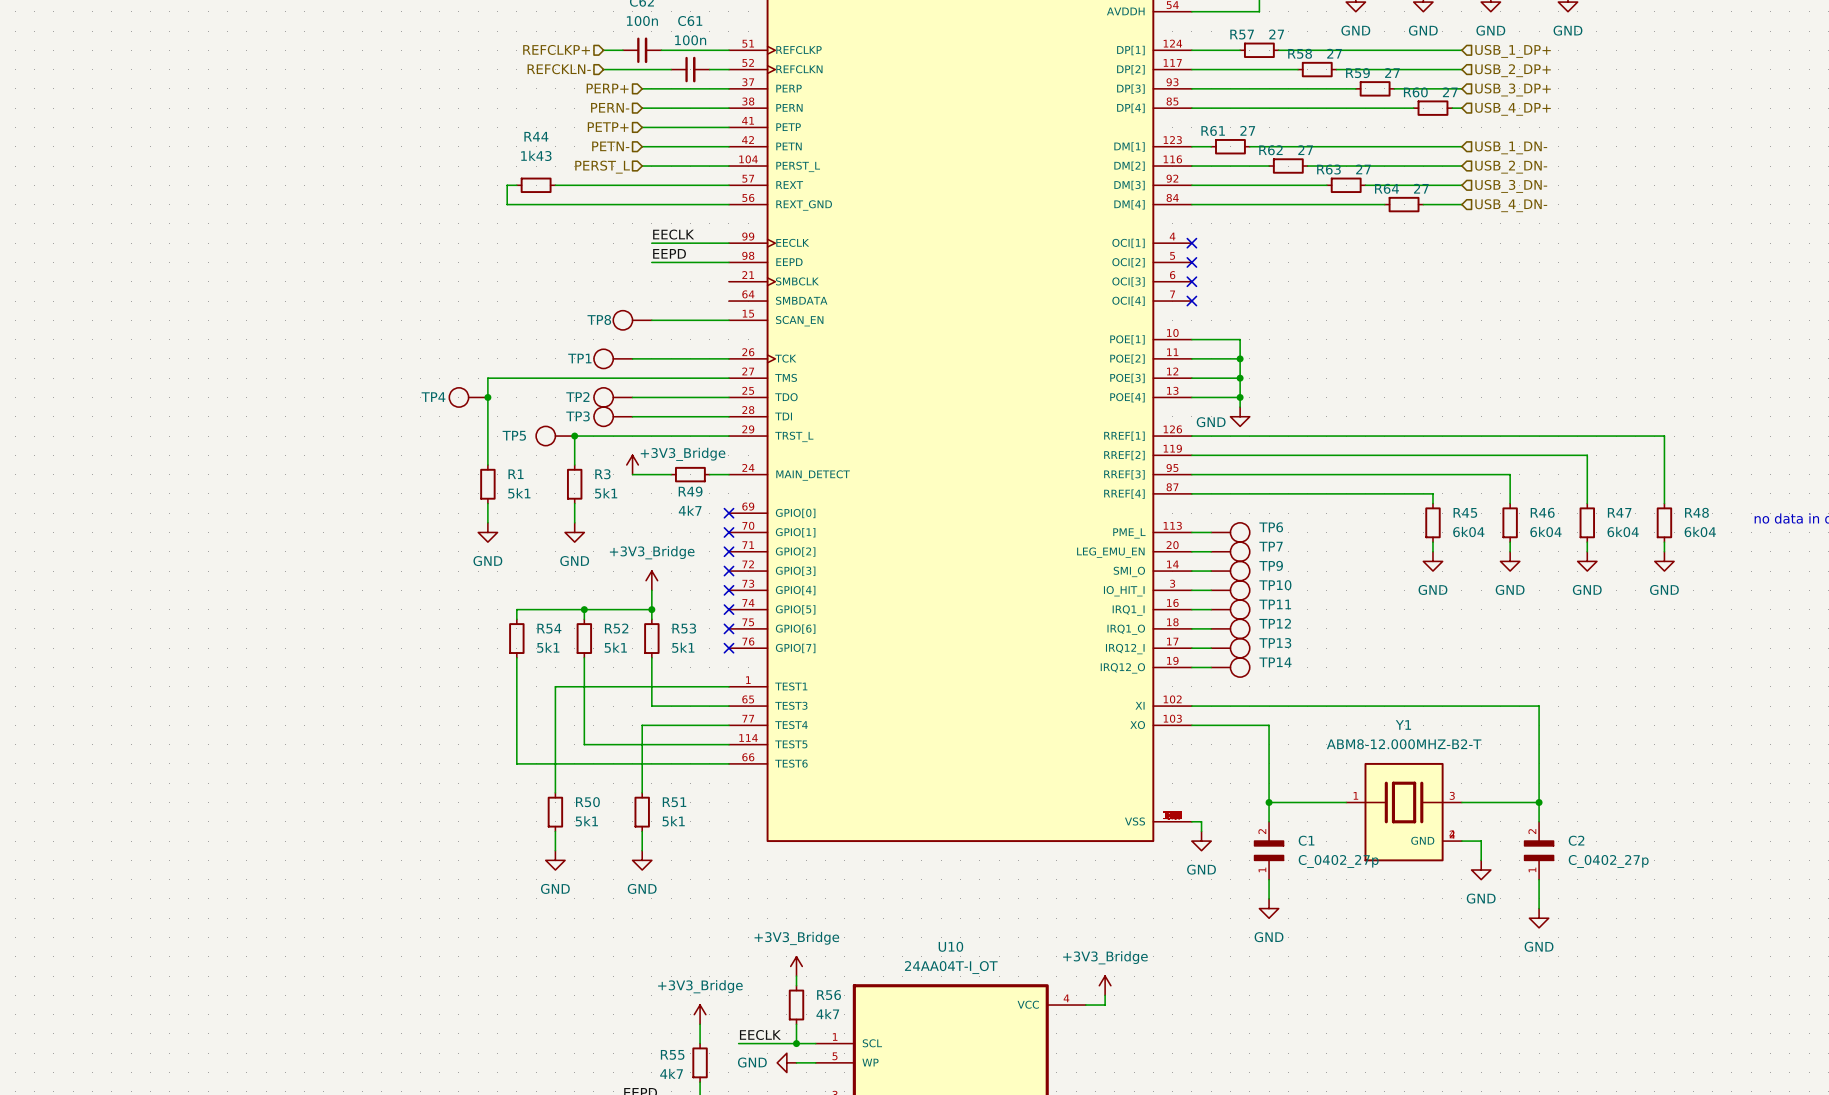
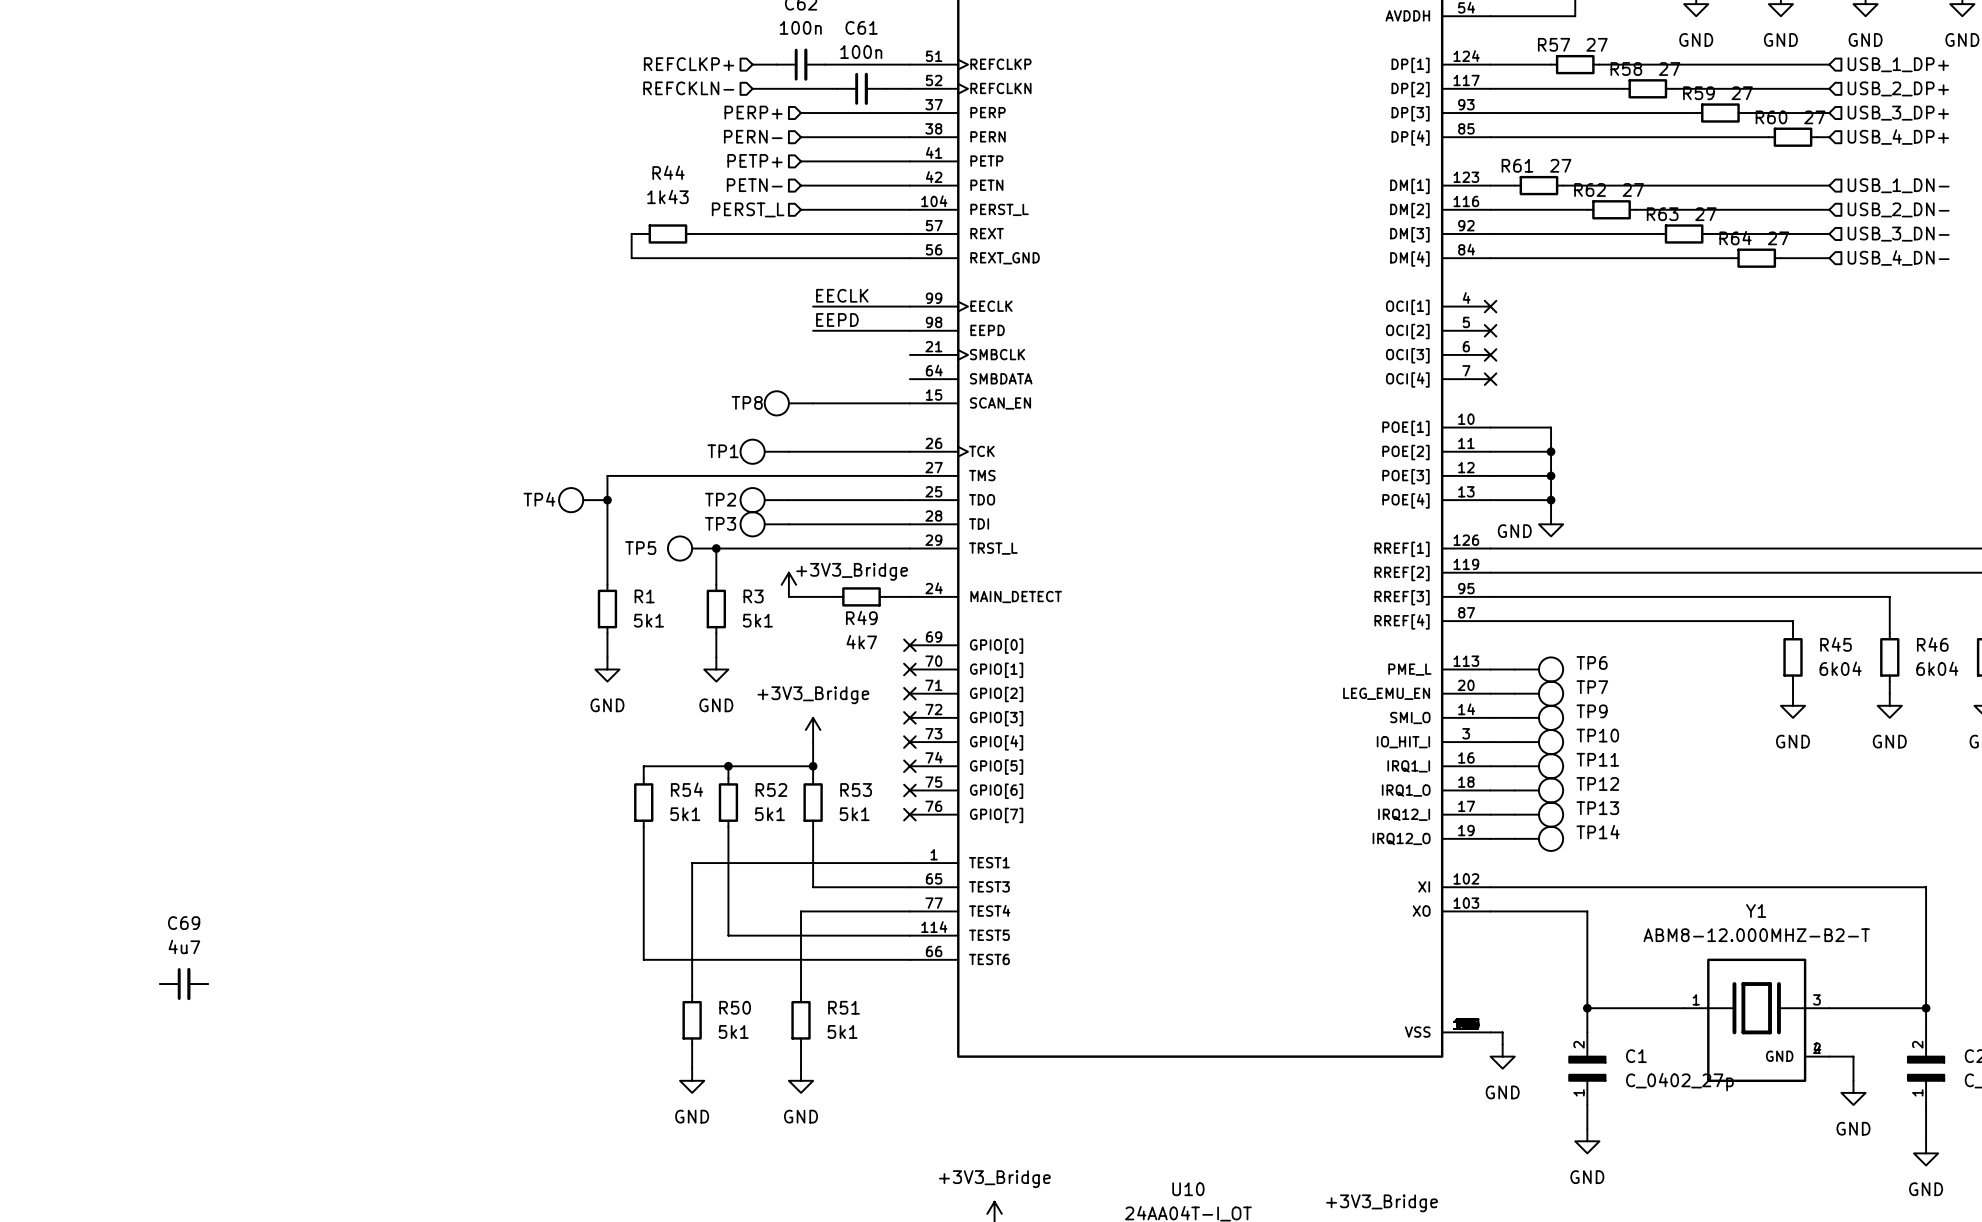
C69: none -> (184, 984)

